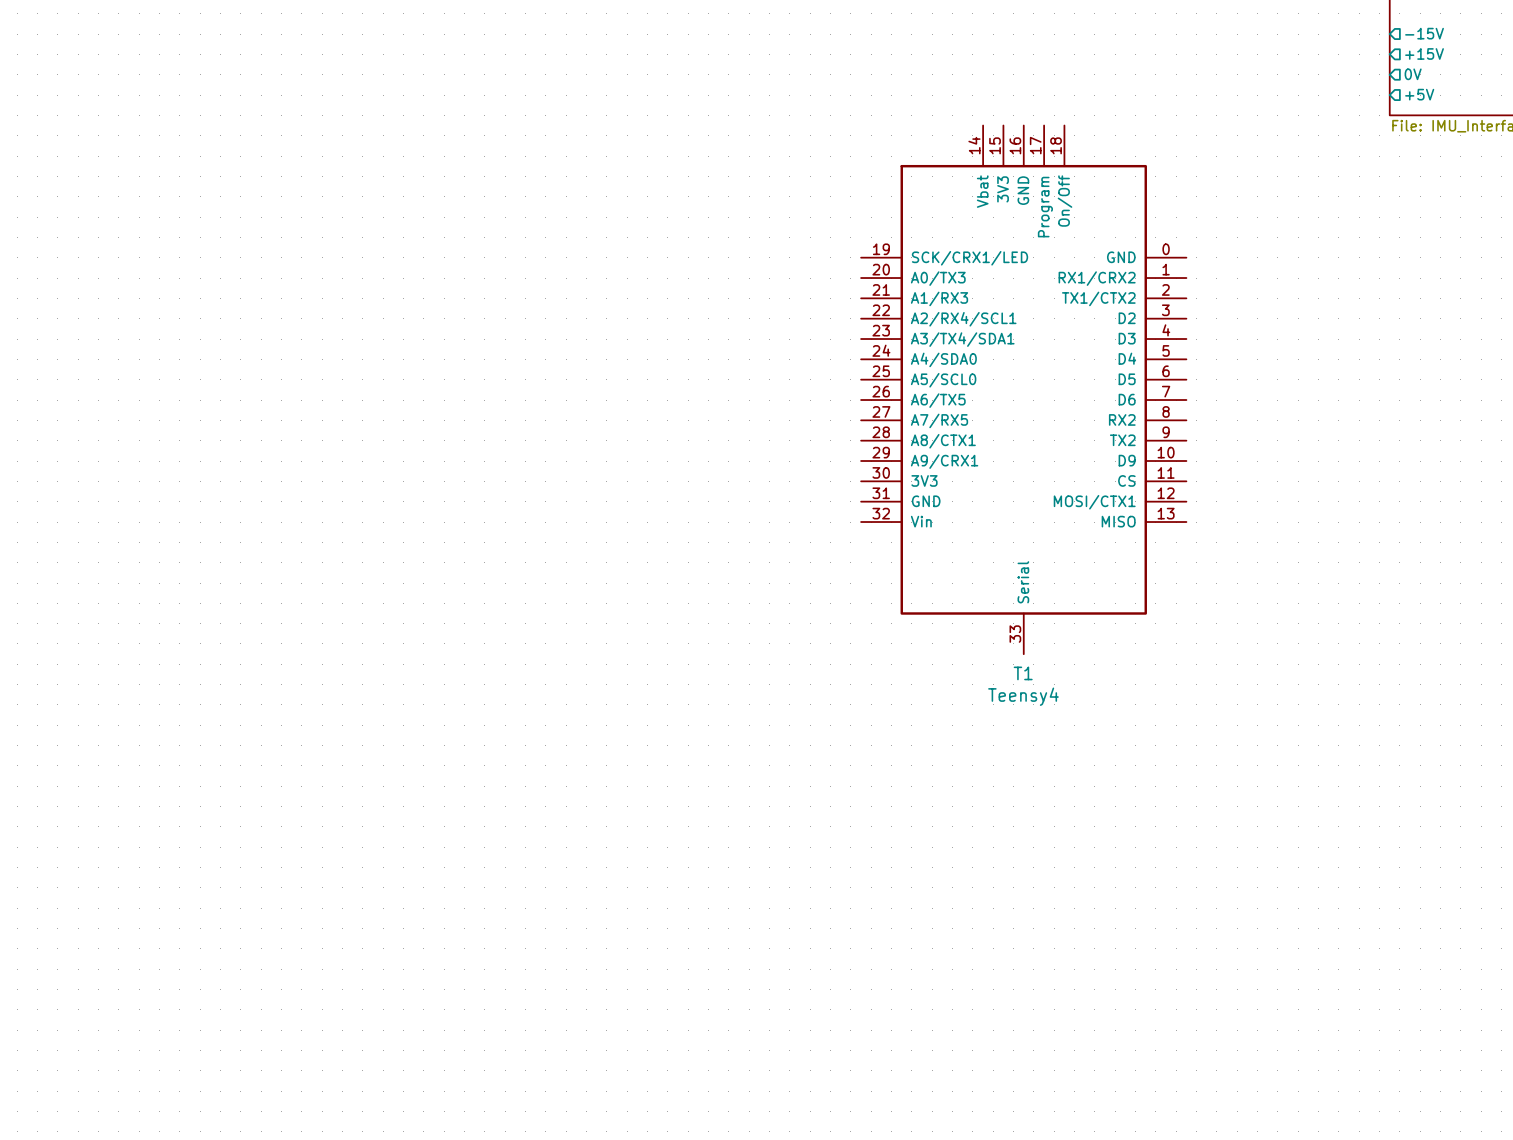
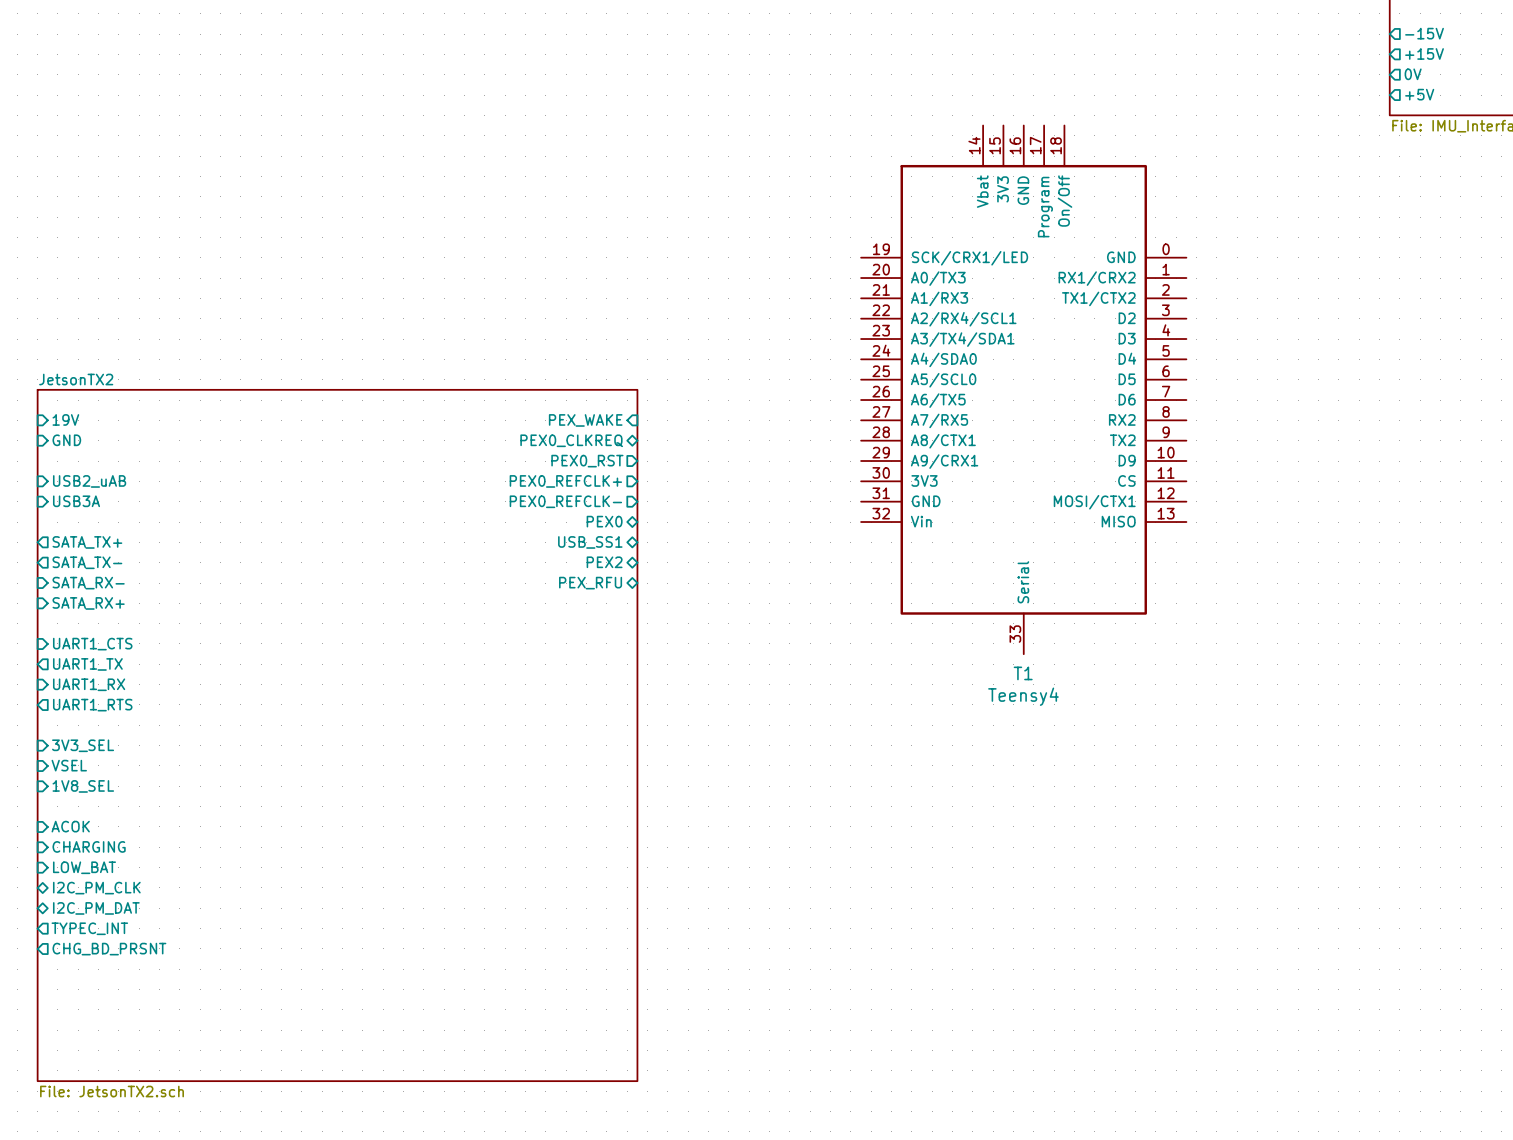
sheet pin: none -> 19V (65, 419)
sheet pin: none -> PEX_WAKE (585, 420)
sheet pin: none -> GND (66, 440)
sheet pin: none -> PEX0_CLKREQ (571, 440)
sheet pin: none -> PEX0_RST (587, 461)
sheet pin: none -> USB2_uAB (89, 481)
sheet pin: none -> PEX0_REFCLK+ (565, 481)
sheet pin: none -> USB3A (76, 501)
sheet pin: none -> PEX0_REFCLK- (565, 501)
sheet pin: none -> PEX0 (604, 521)
sheet pin: none -> SATA_TX+ (87, 542)
sheet pin: none -> USB_SS1 (590, 542)
sheet pin: none -> SATA_TX- (87, 562)
sheet pin: none -> PEX2 (604, 562)
sheet pin: none -> SATA_RX- (88, 583)
sheet pin: none -> PEX_RFU (590, 583)
sheet pin: none -> SATA_RX+ (88, 603)
sheet pin: none -> UART1_CTS (92, 644)
sheet pin: none -> UART1_TX (87, 664)
sheet pin: none -> UART1_RX (89, 684)
sheet pin: none -> UART1_RTS (92, 705)
sheet JetsonTX2: none -> File: JetsonTX2.sch (337, 735)
sheet pin: none -> 3V3_SEL (83, 745)
sheet pin: none -> VSEL (69, 765)
sheet pin: none -> 1V8_SEL (83, 786)
sheet pin: none -> ACOK (70, 826)
sheet pin: none -> CHARGING (89, 846)
sheet pin: none -> LOW_BAT (84, 867)
sheet pin: none -> I2C_PM_CLK (96, 888)
sheet pin: none -> I2C_PM_DAT (96, 908)
sheet pin: none -> TYPEC_INT (89, 928)
sheet pin: none -> CHG_BD_PRSNT (109, 949)

